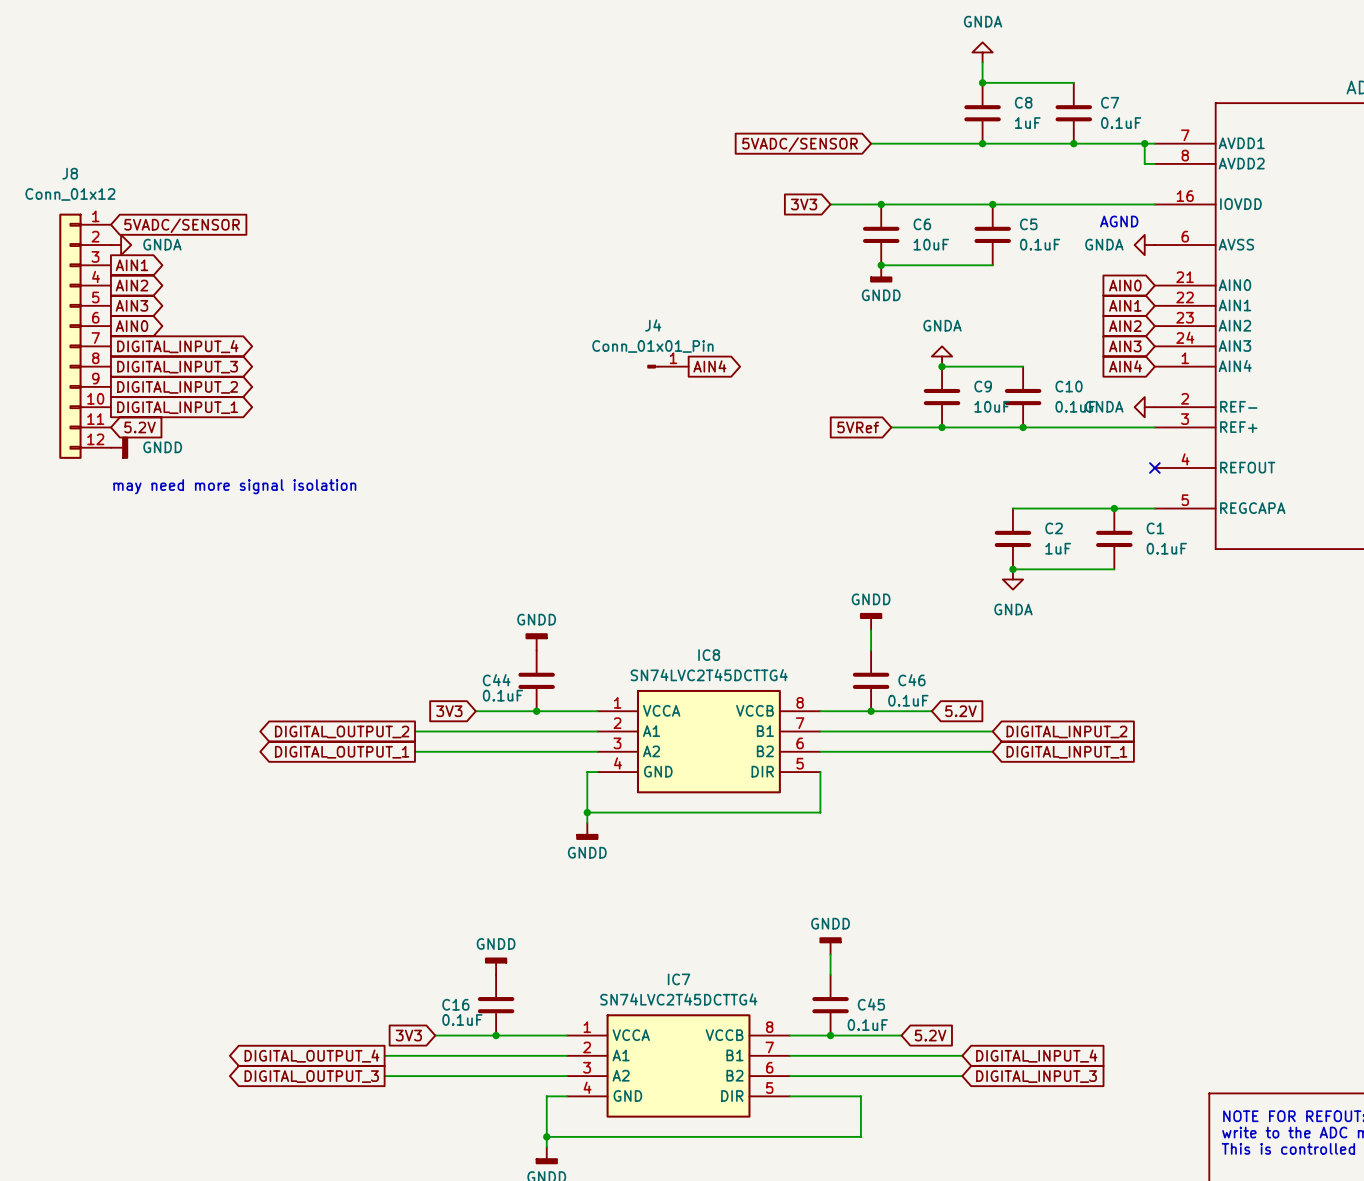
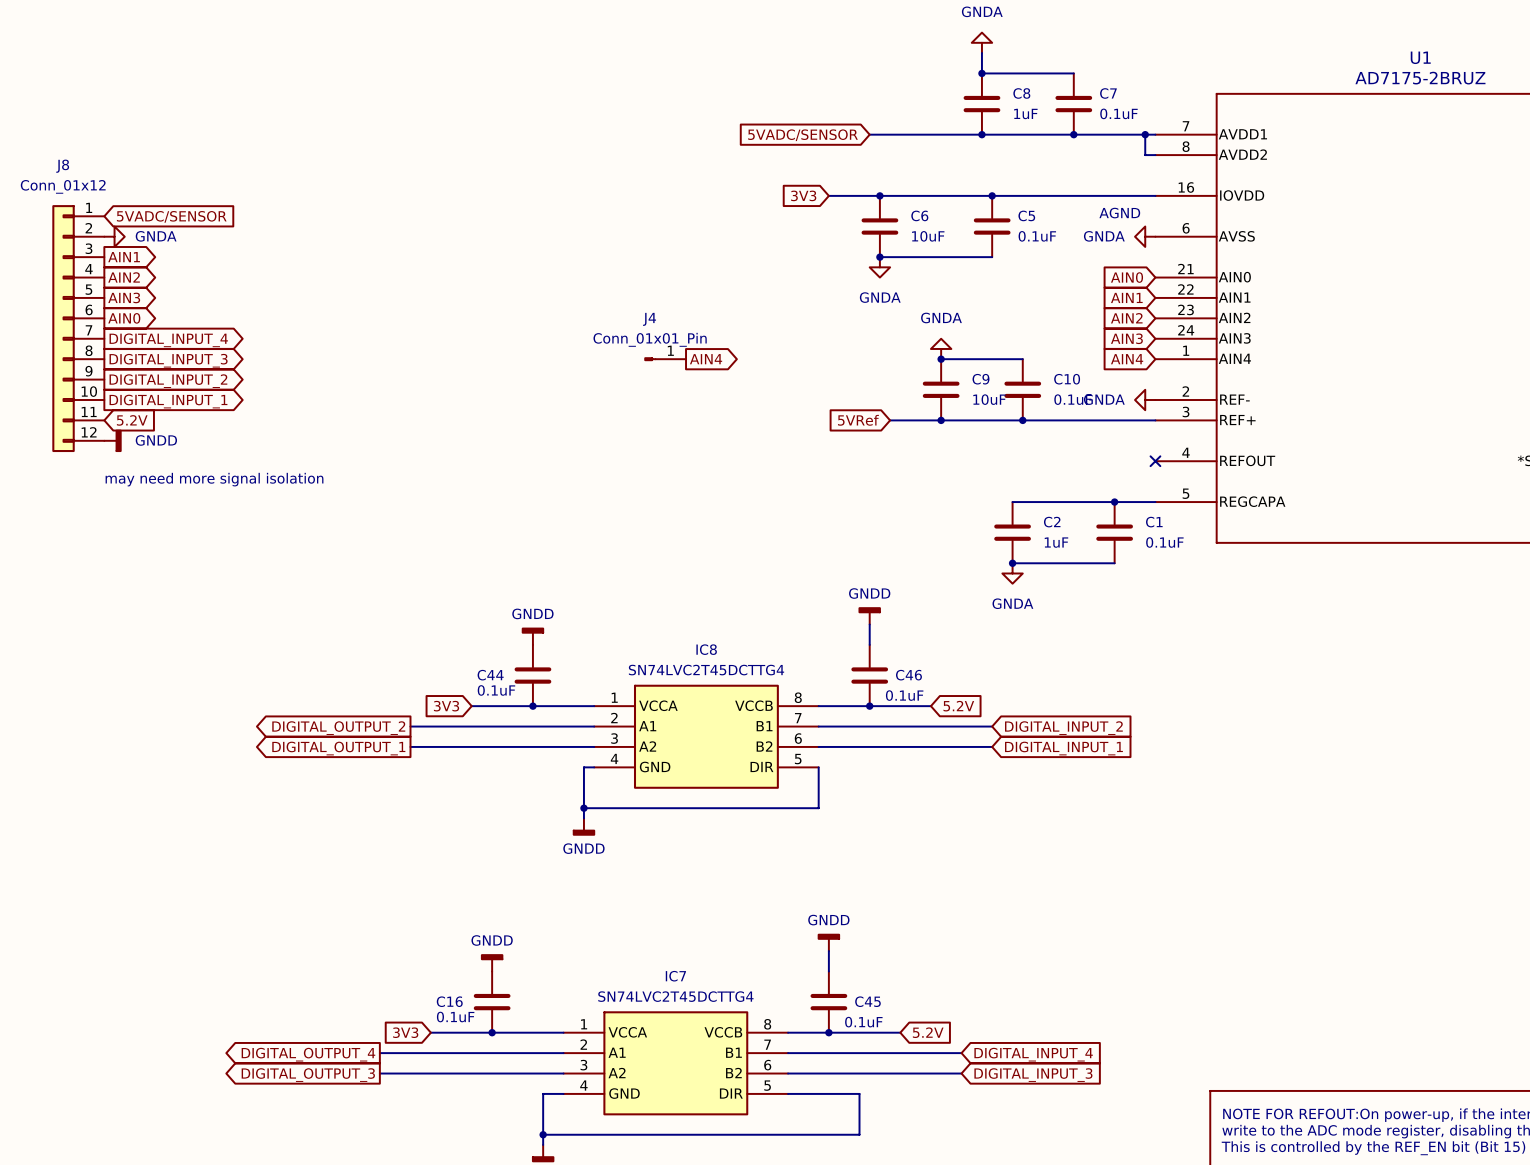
power symbol: GNDD (881, 273) -> GNDA (879, 267)

